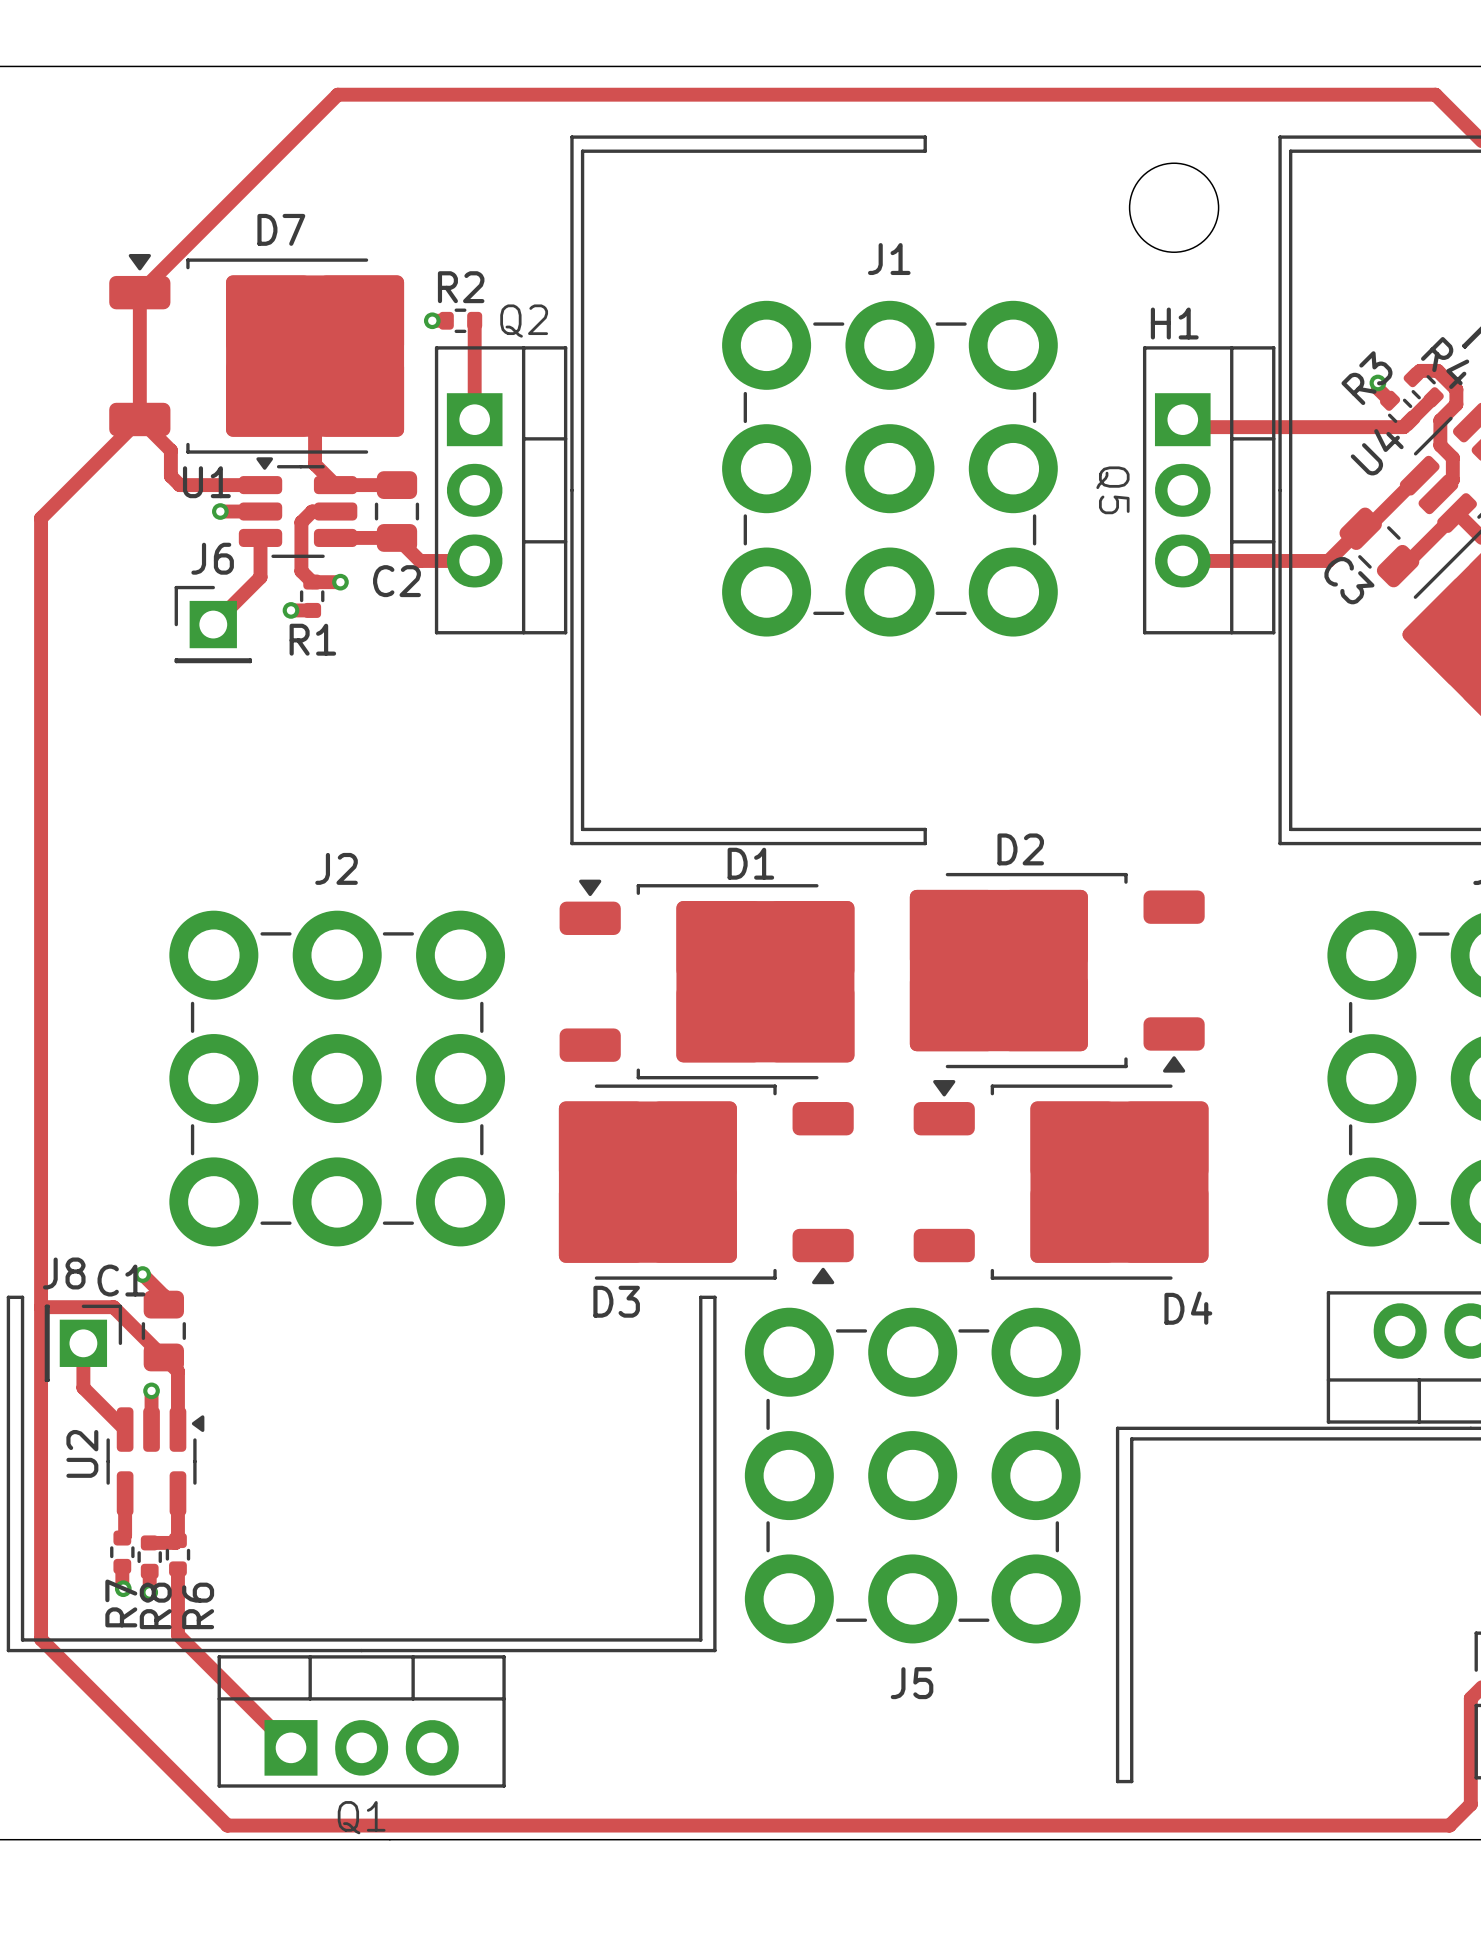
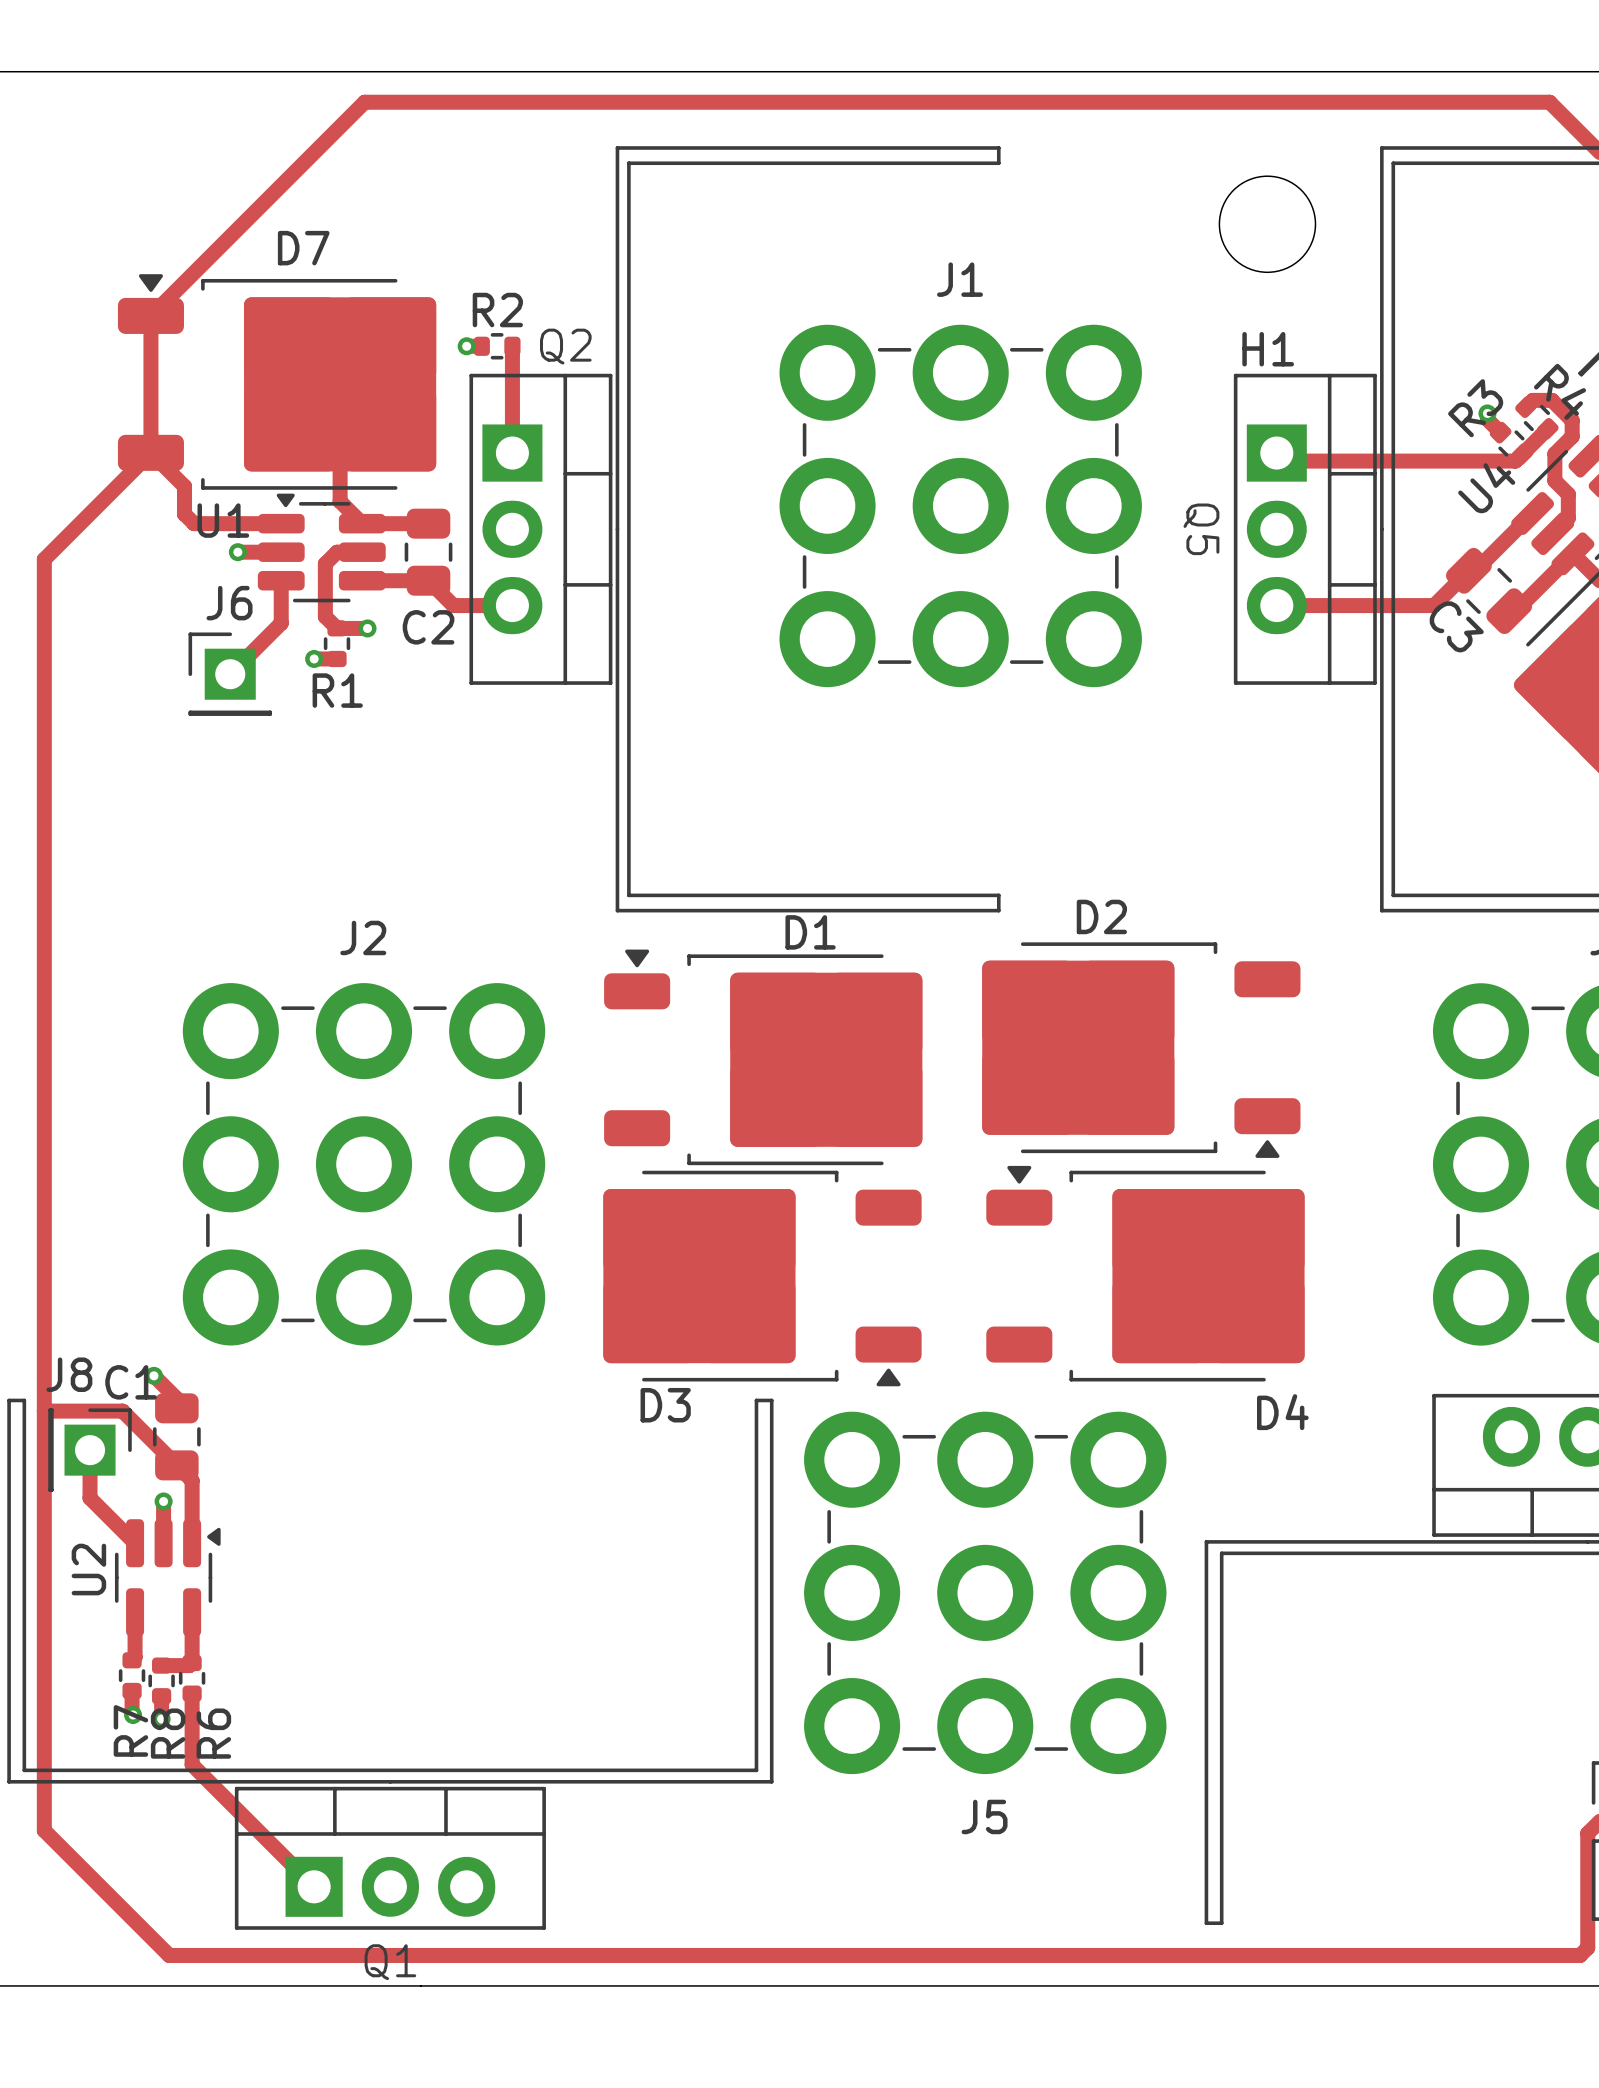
track: (41, 1639) (227, 1825) (1449, 1825) (1463, 1811) -> (44, 1769) (44, 1830) (169, 1955) (1580, 1955)

